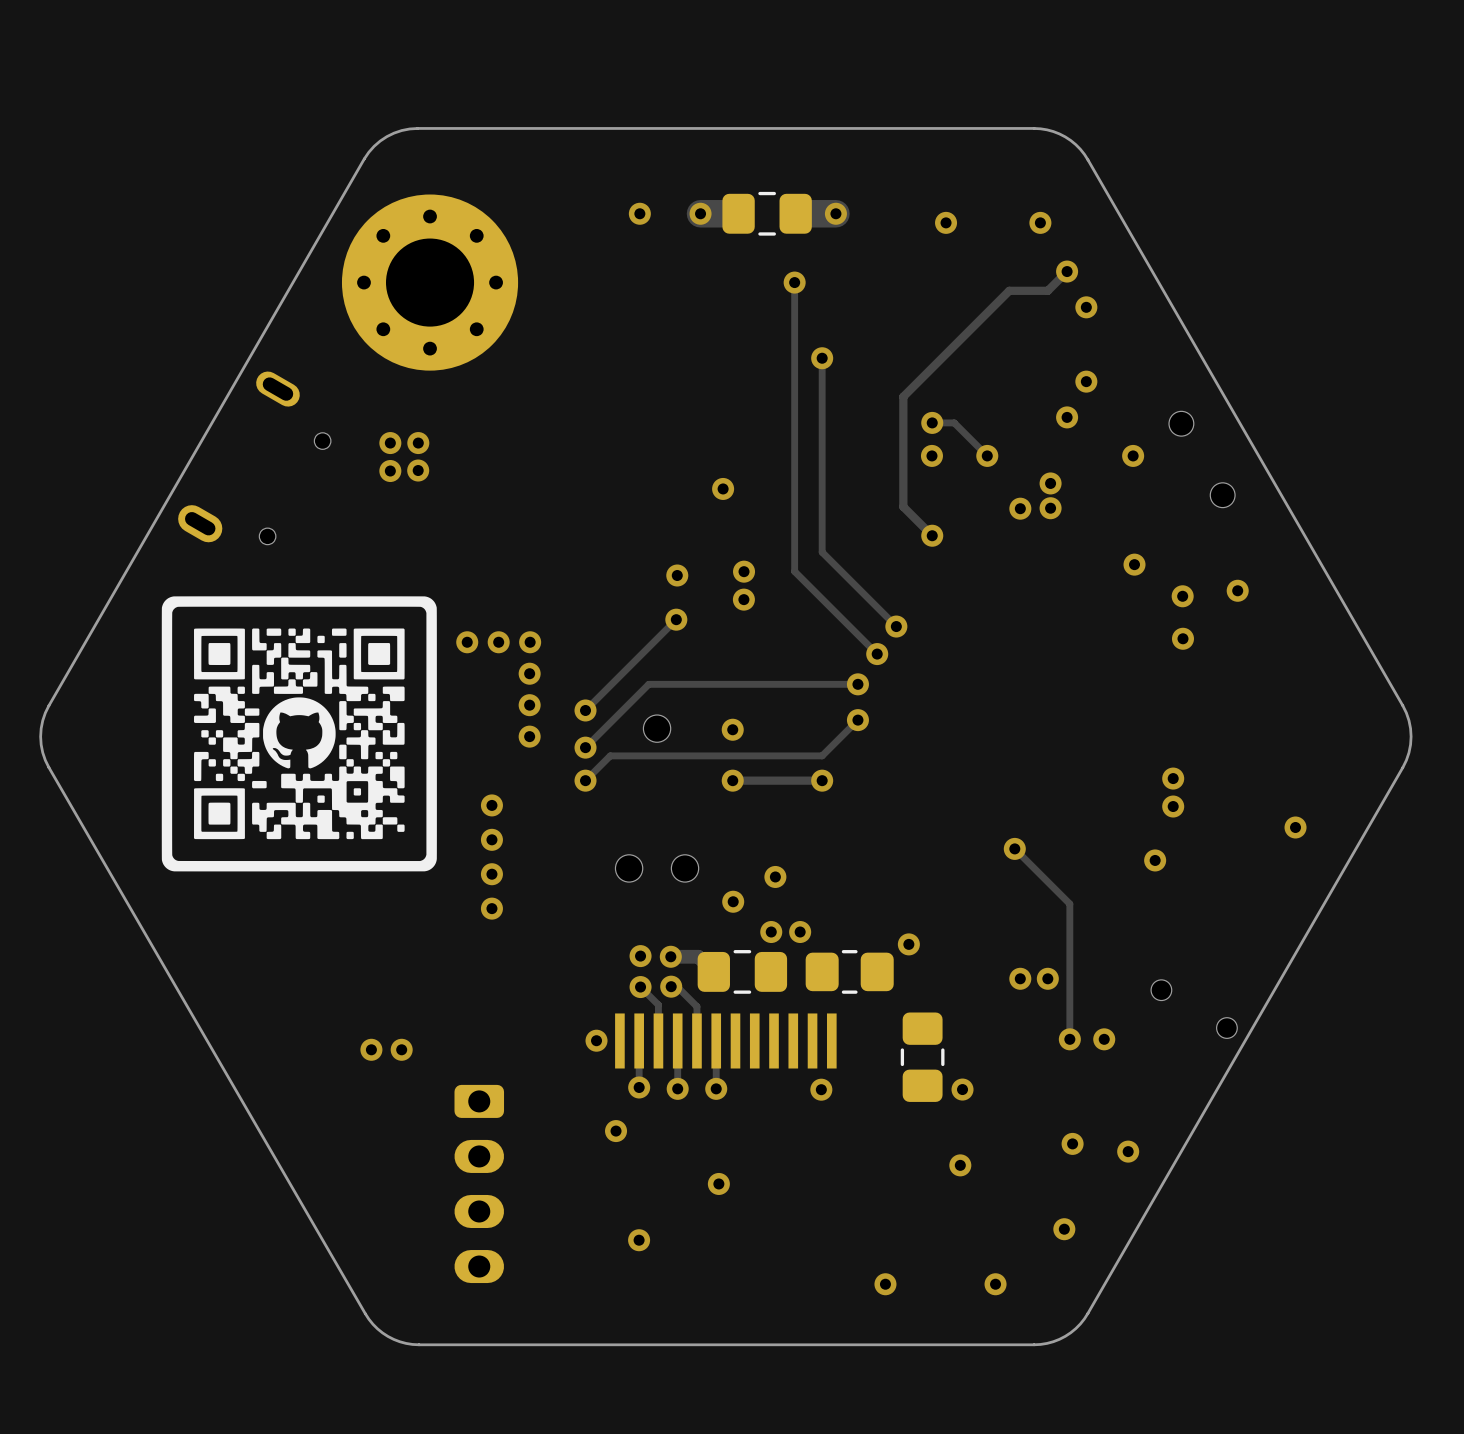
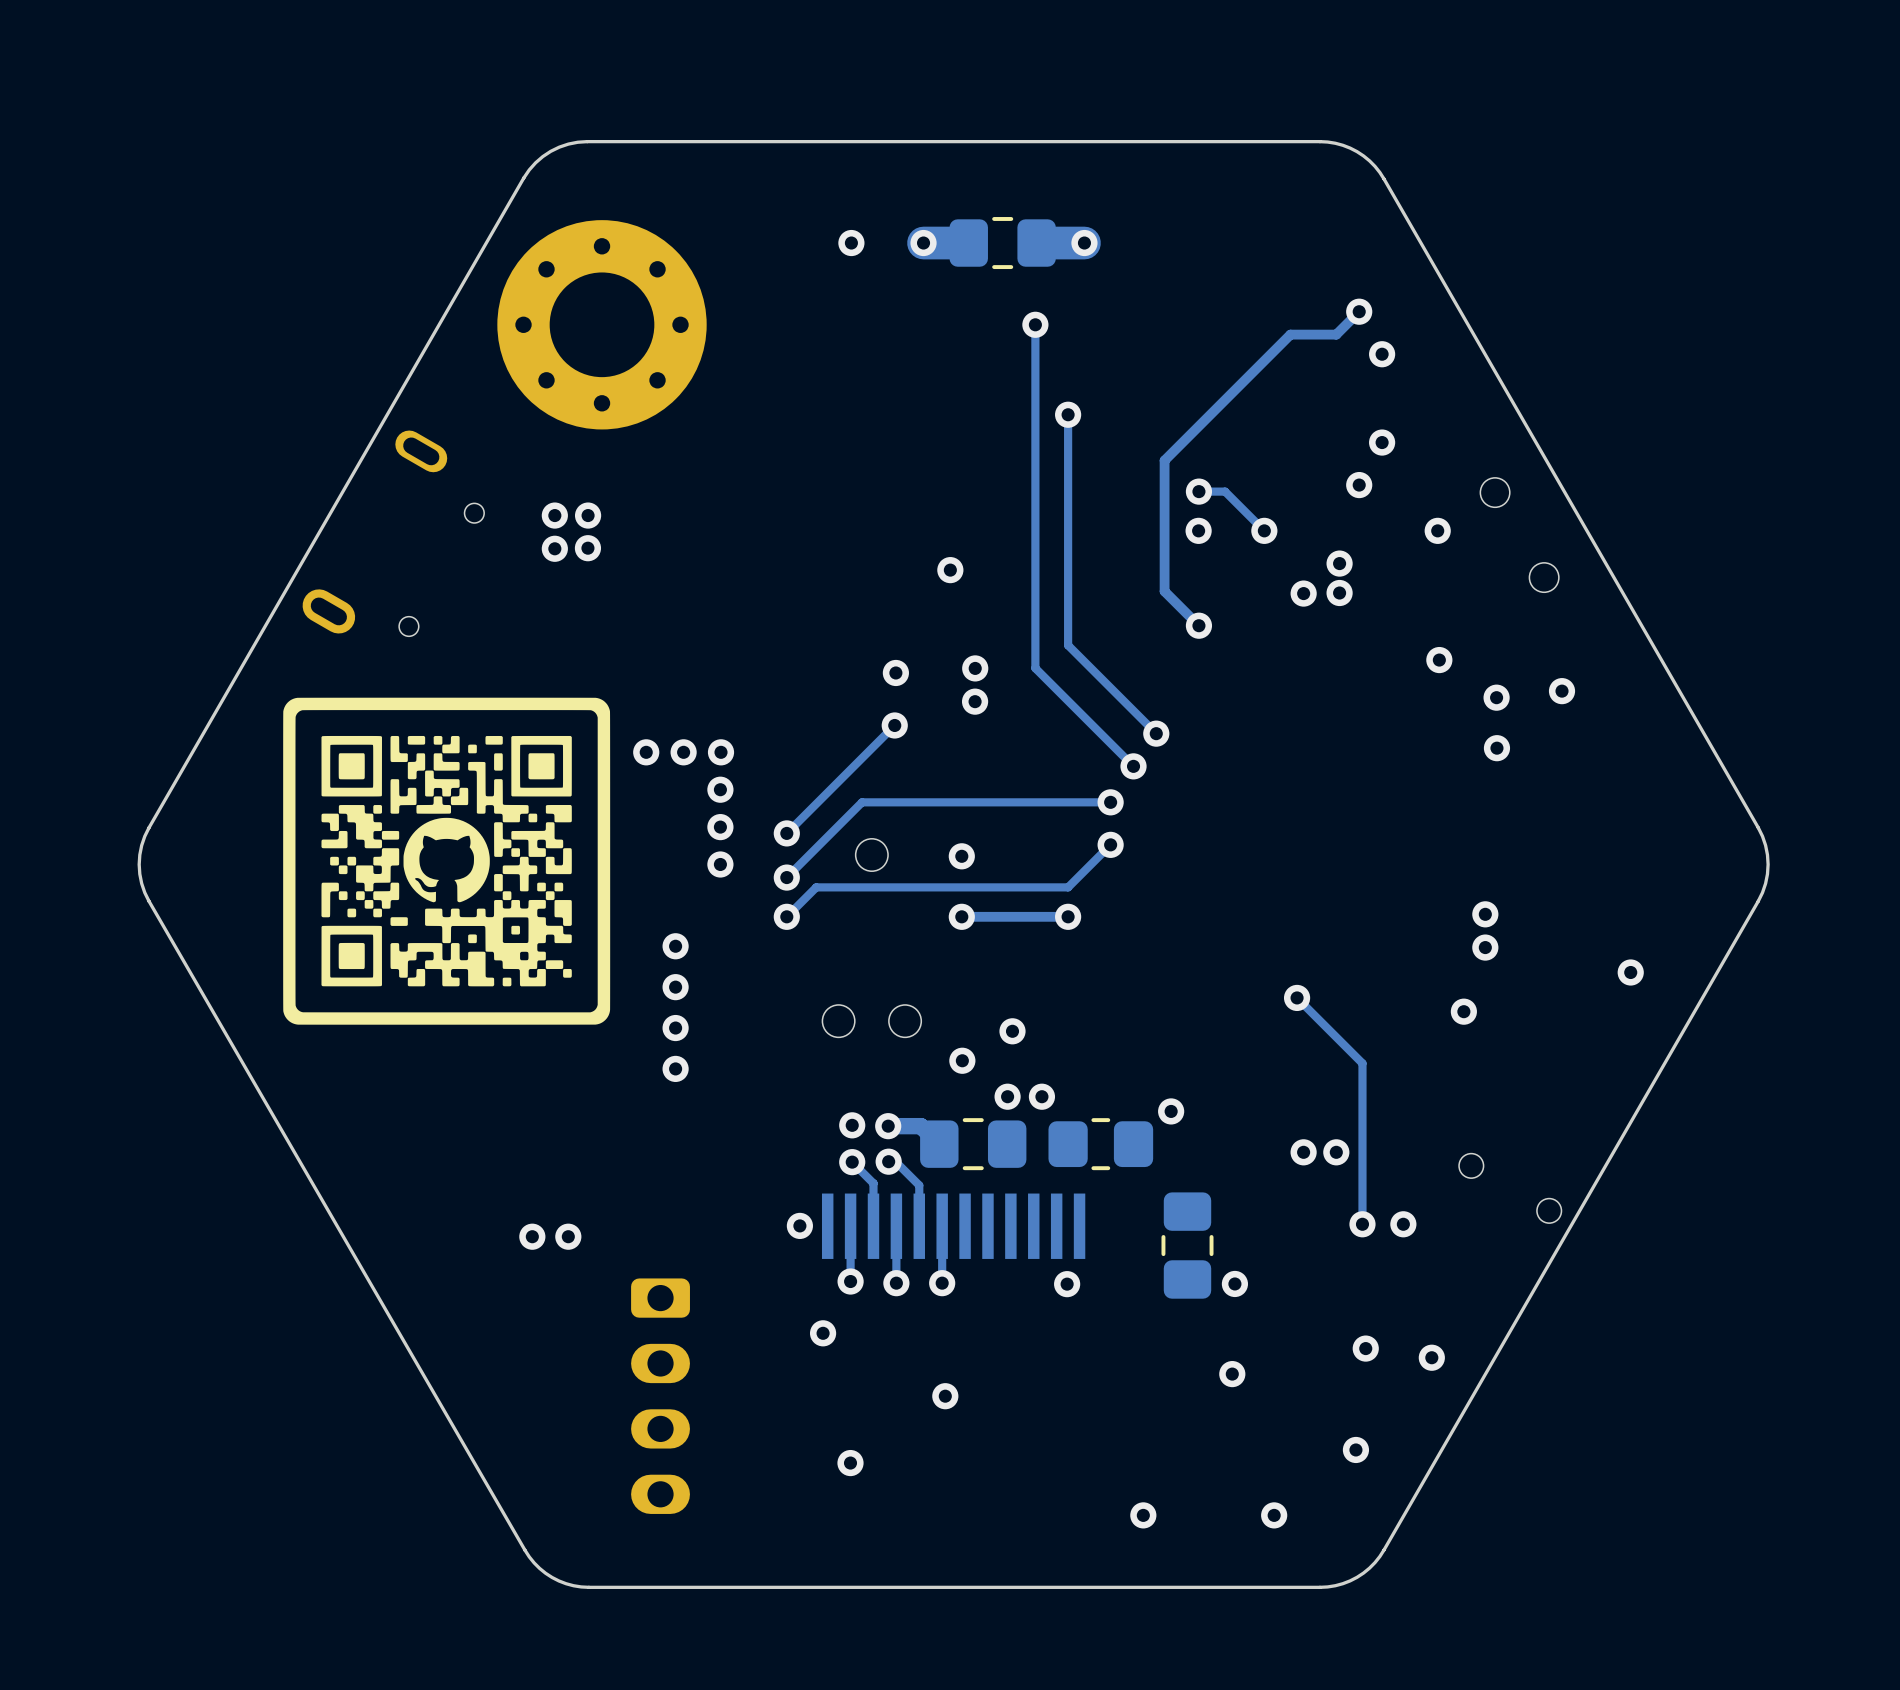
via: (946, 222) -> none
via: (1040, 222) -> none

